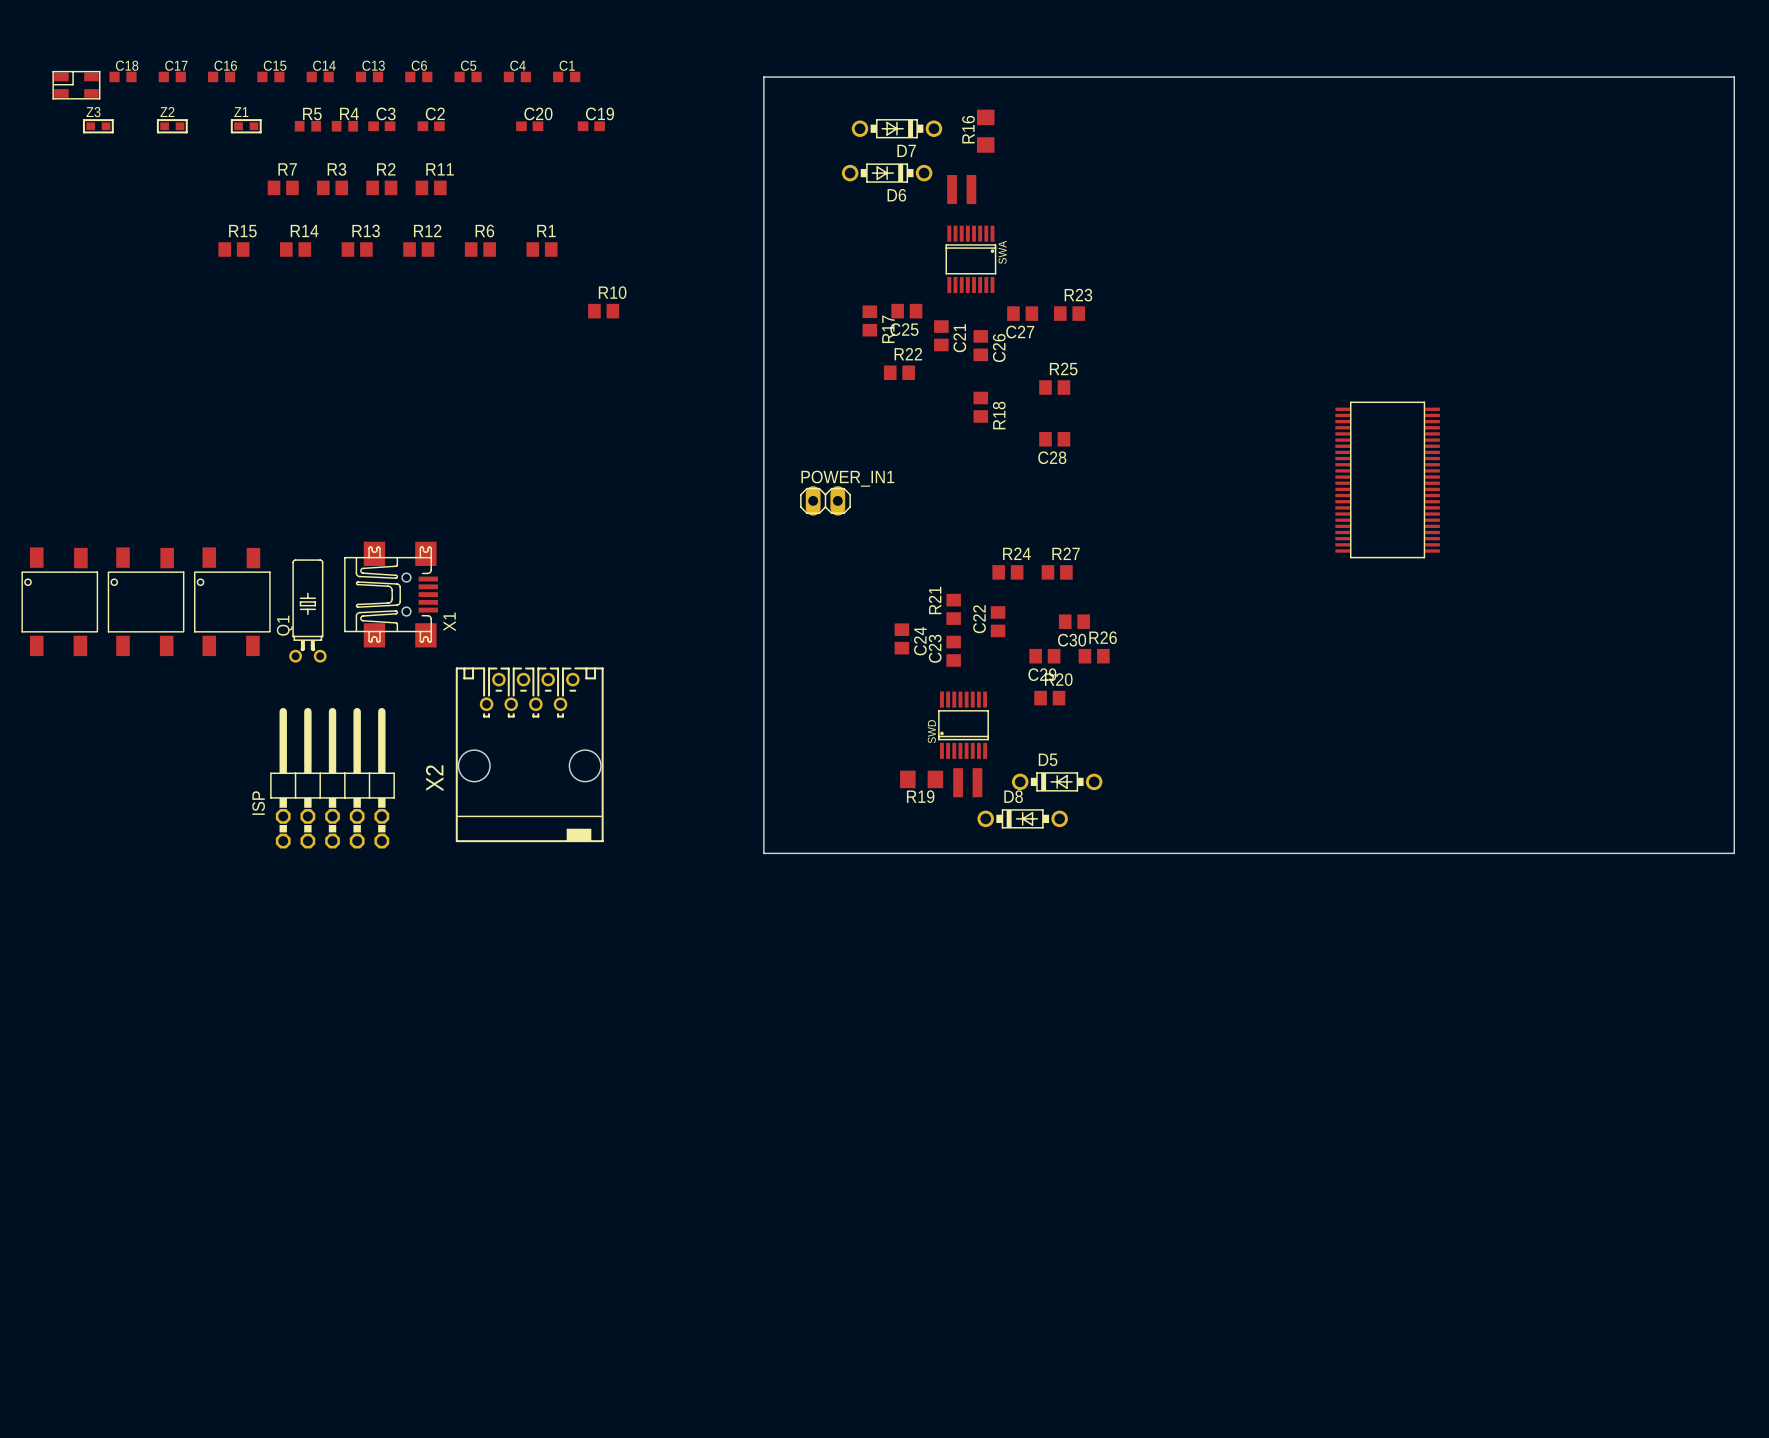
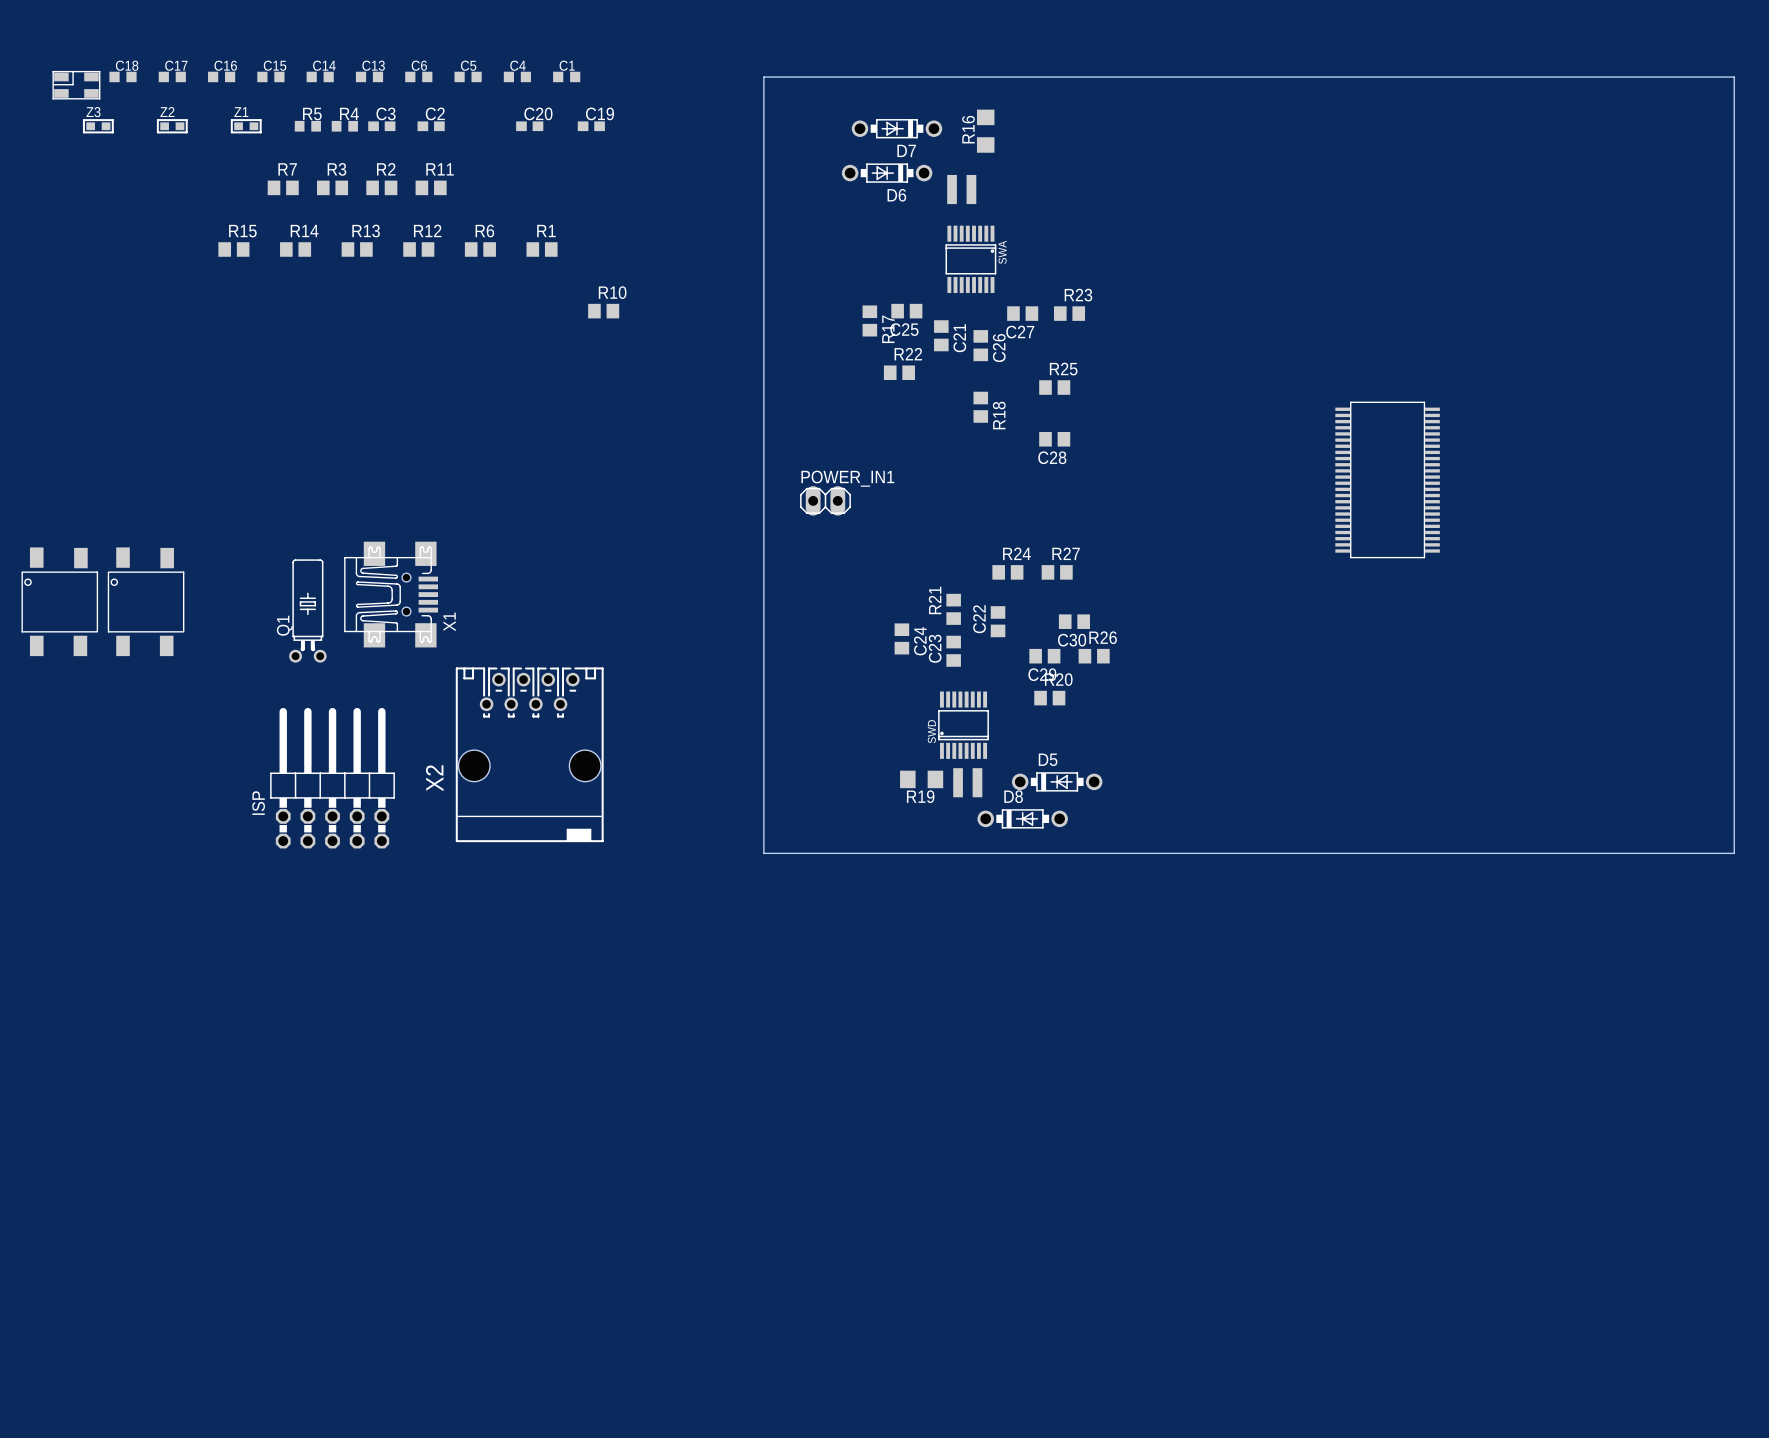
part: (232, 601) -> none

